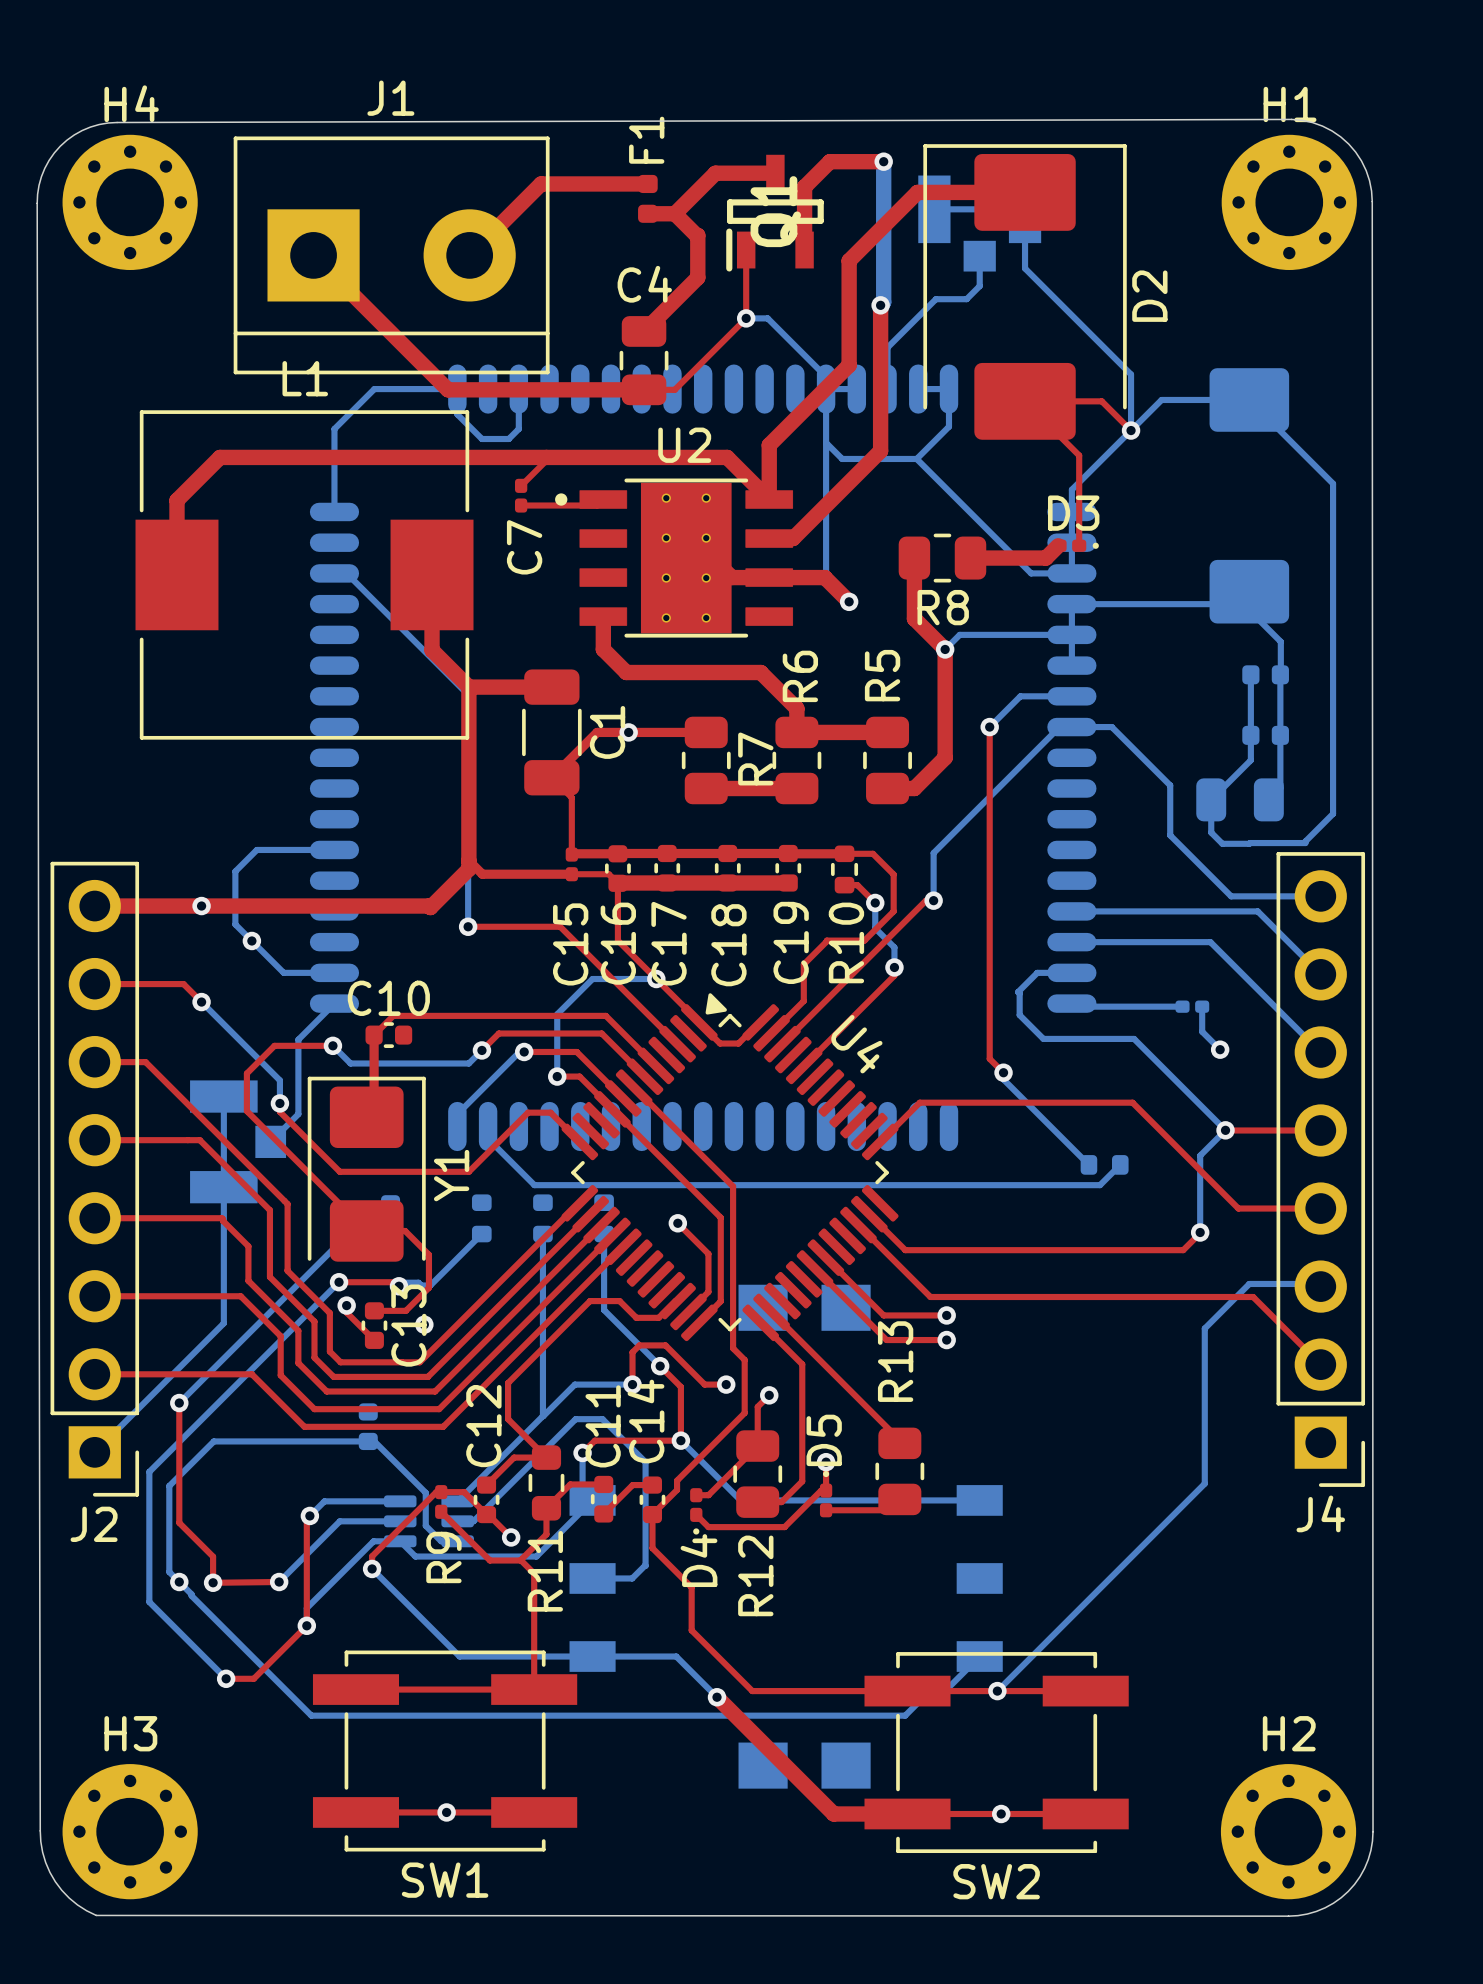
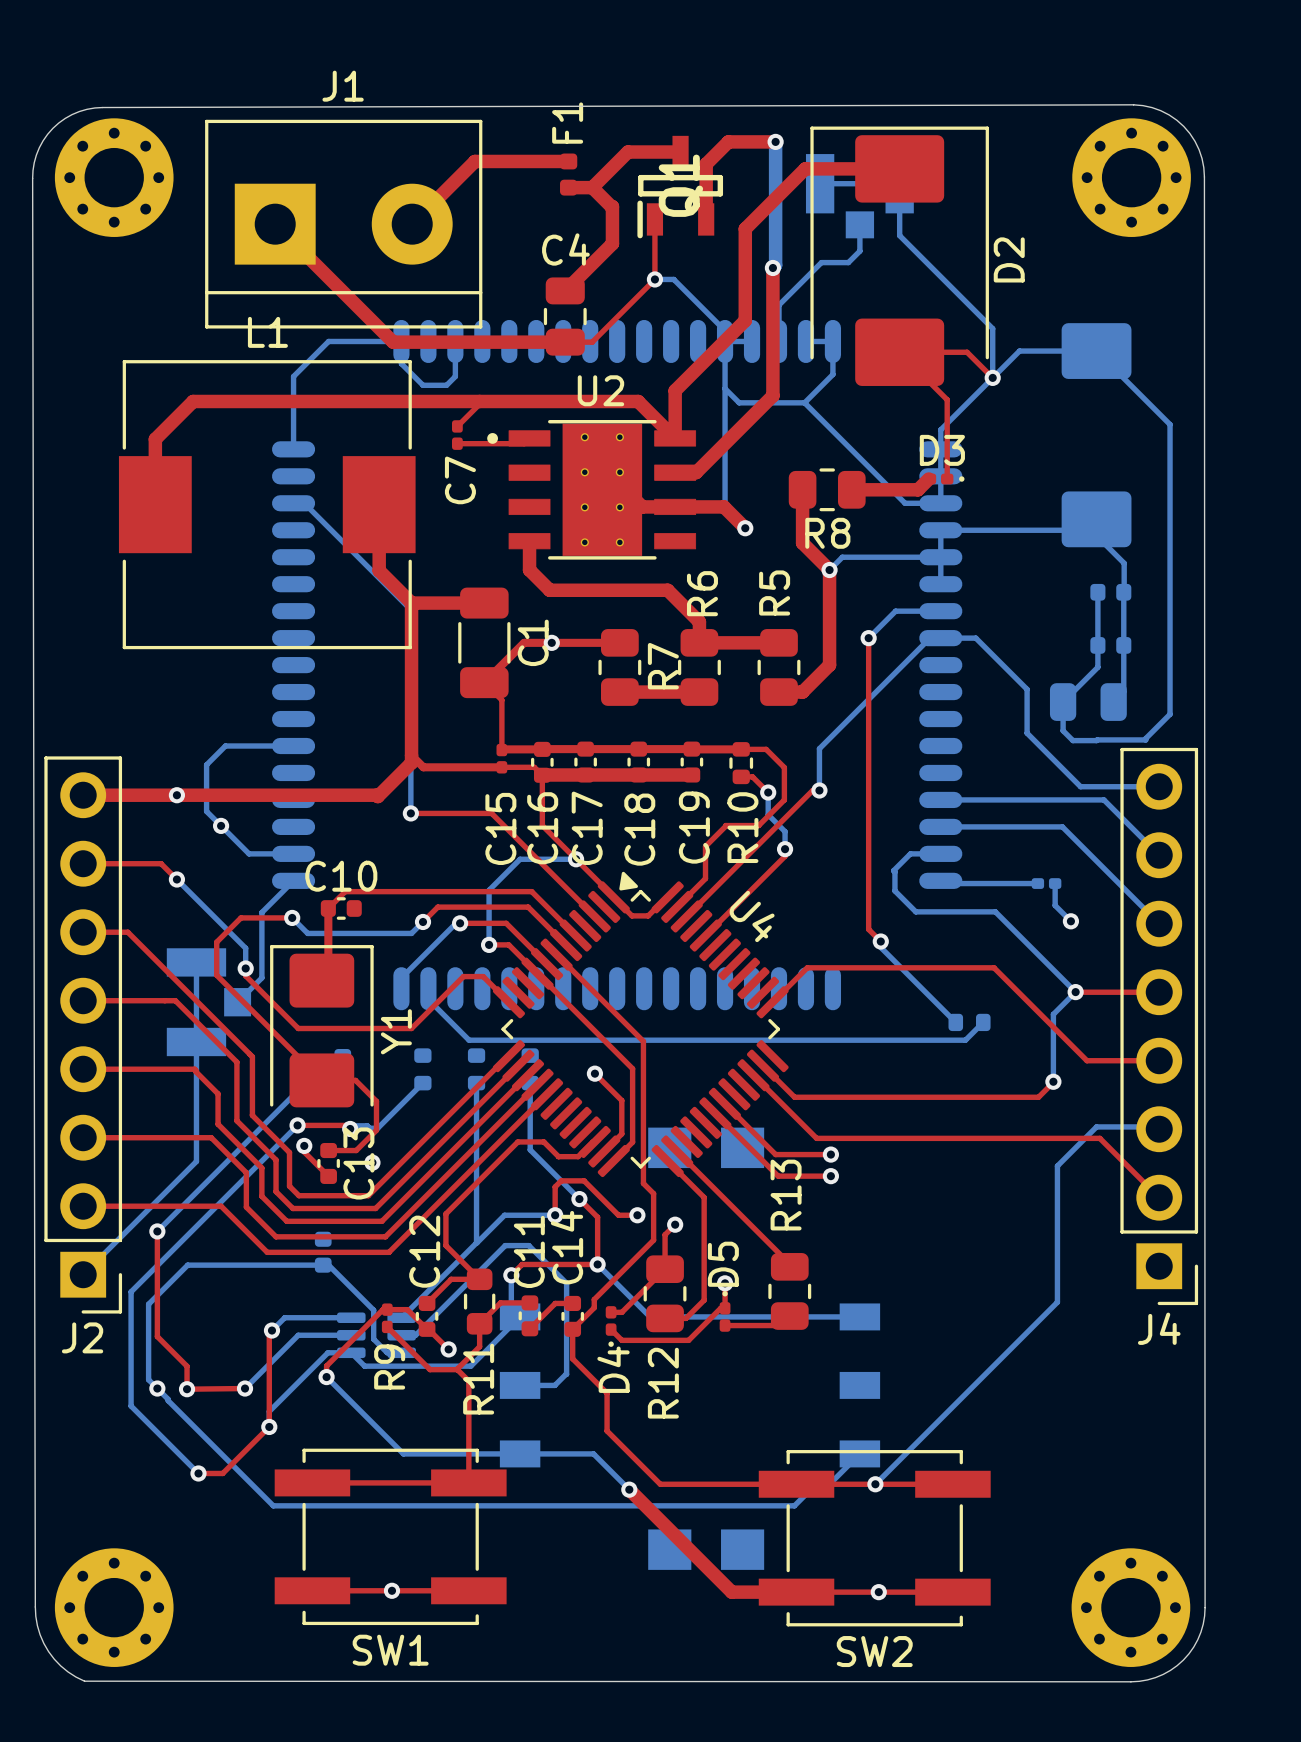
H4 name: H4 (131, 103) -> none
H1 name: H1 (1290, 104) -> none
H3 name: H3 (130, 1733) -> none
H2 name: H2 (1289, 1733) -> none

